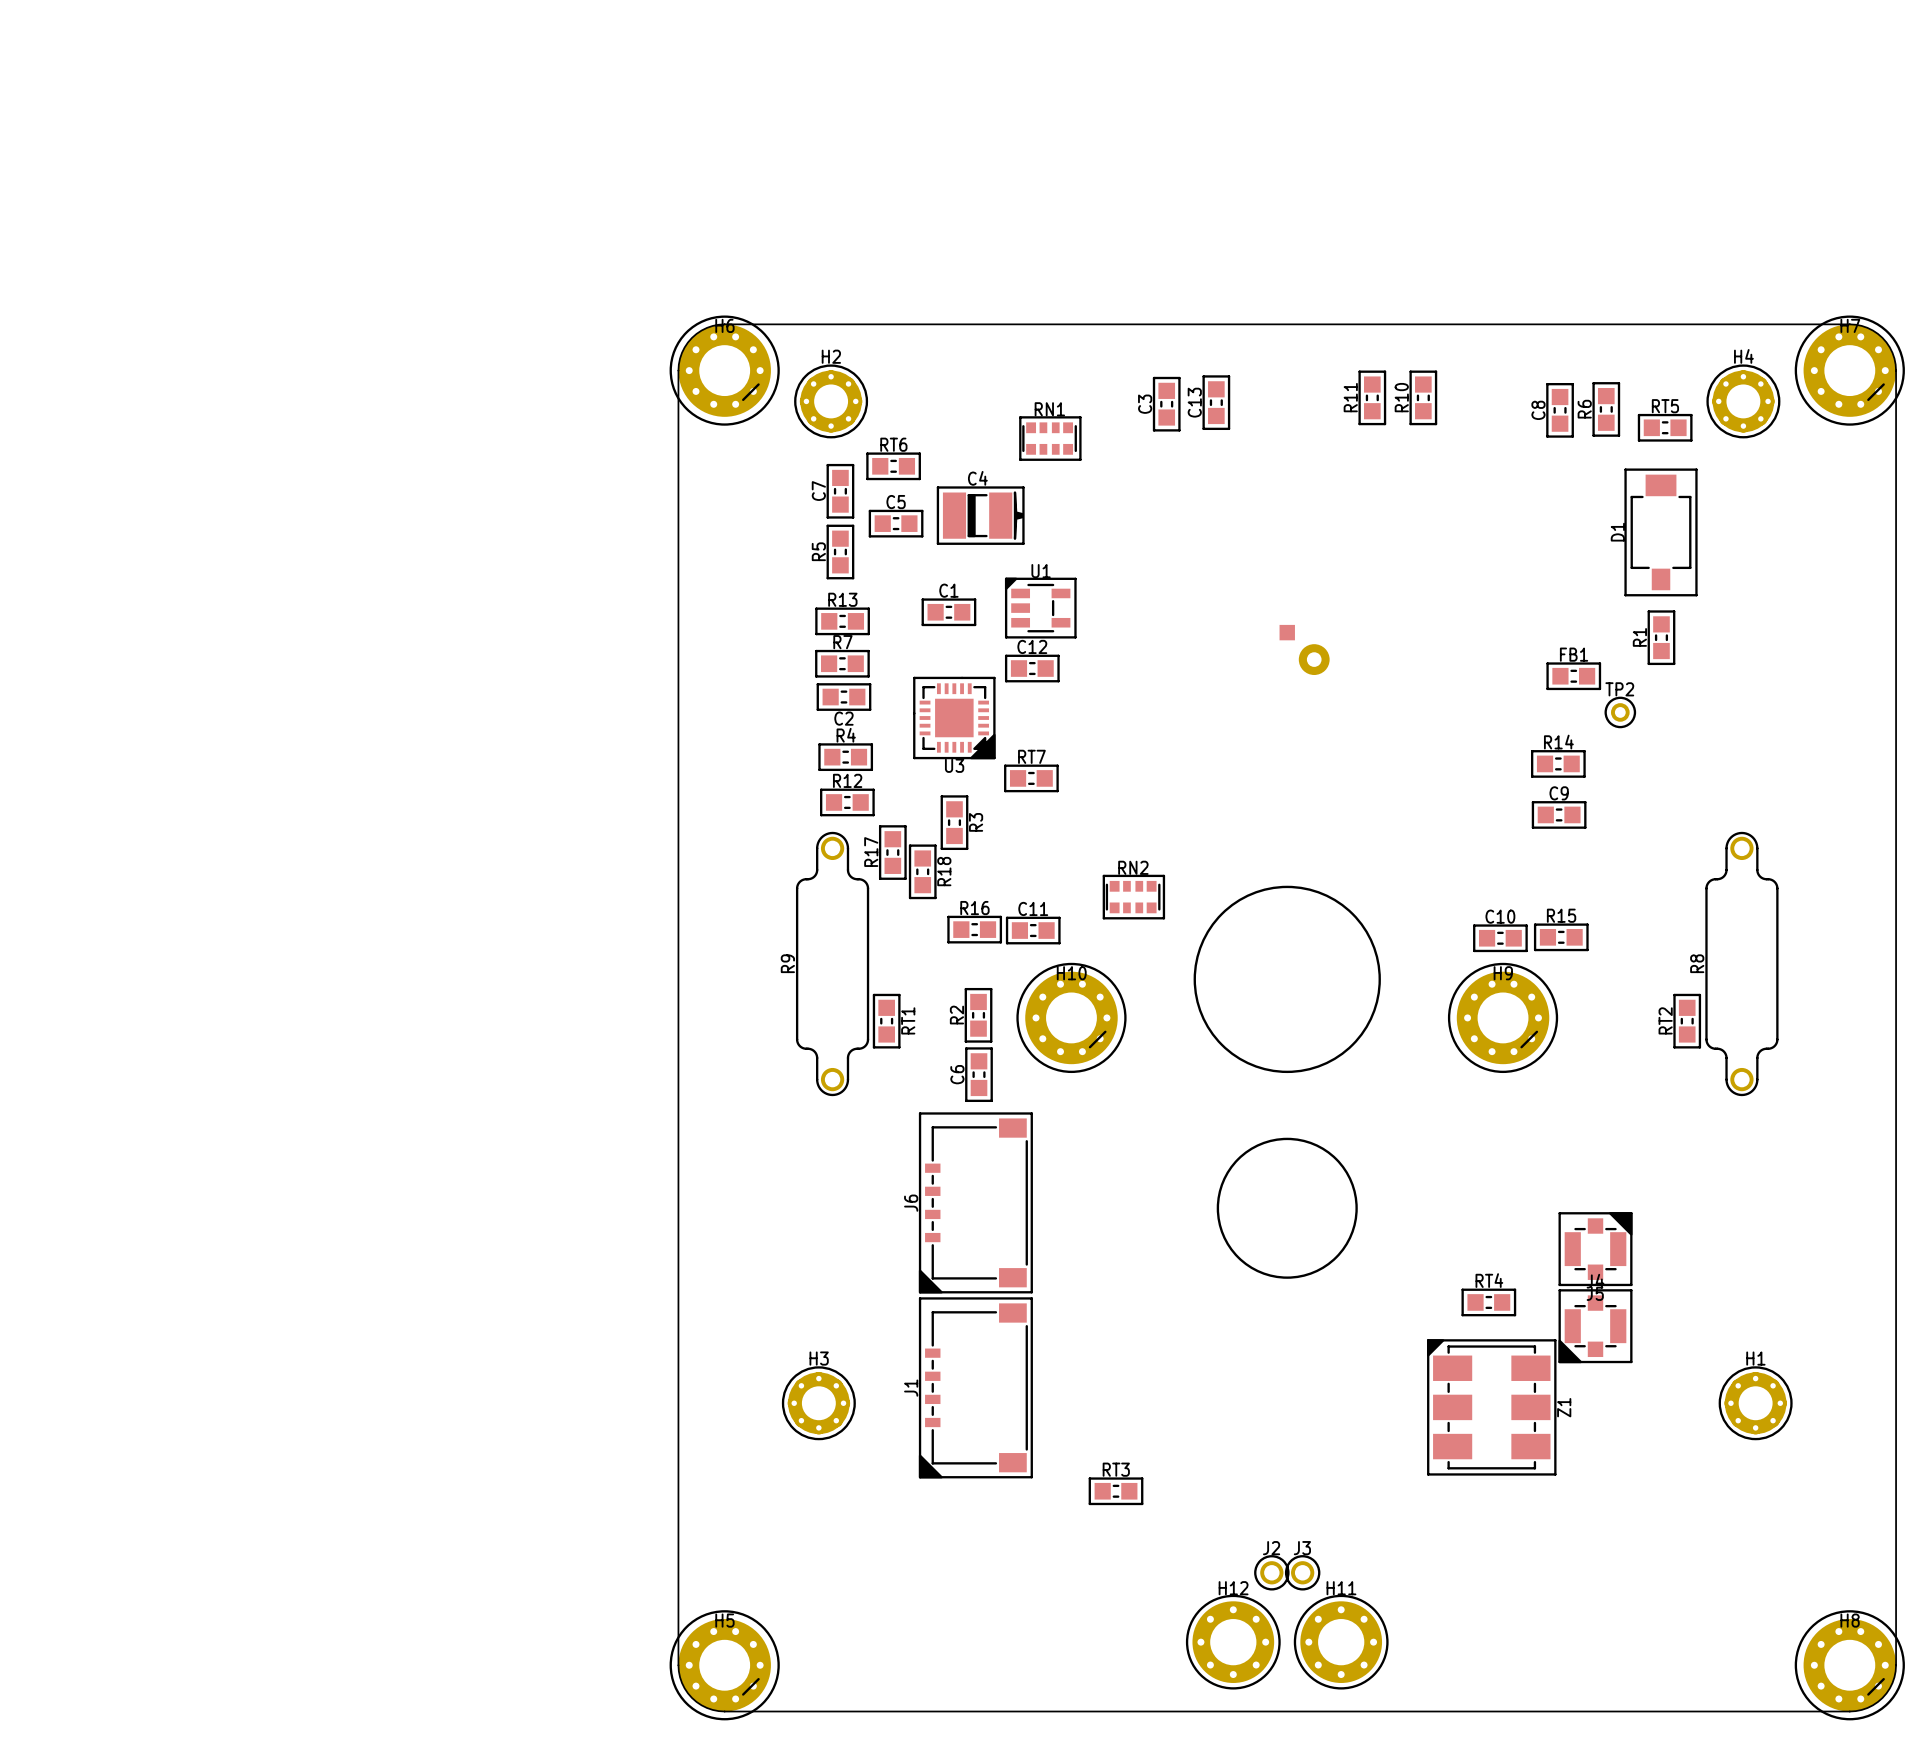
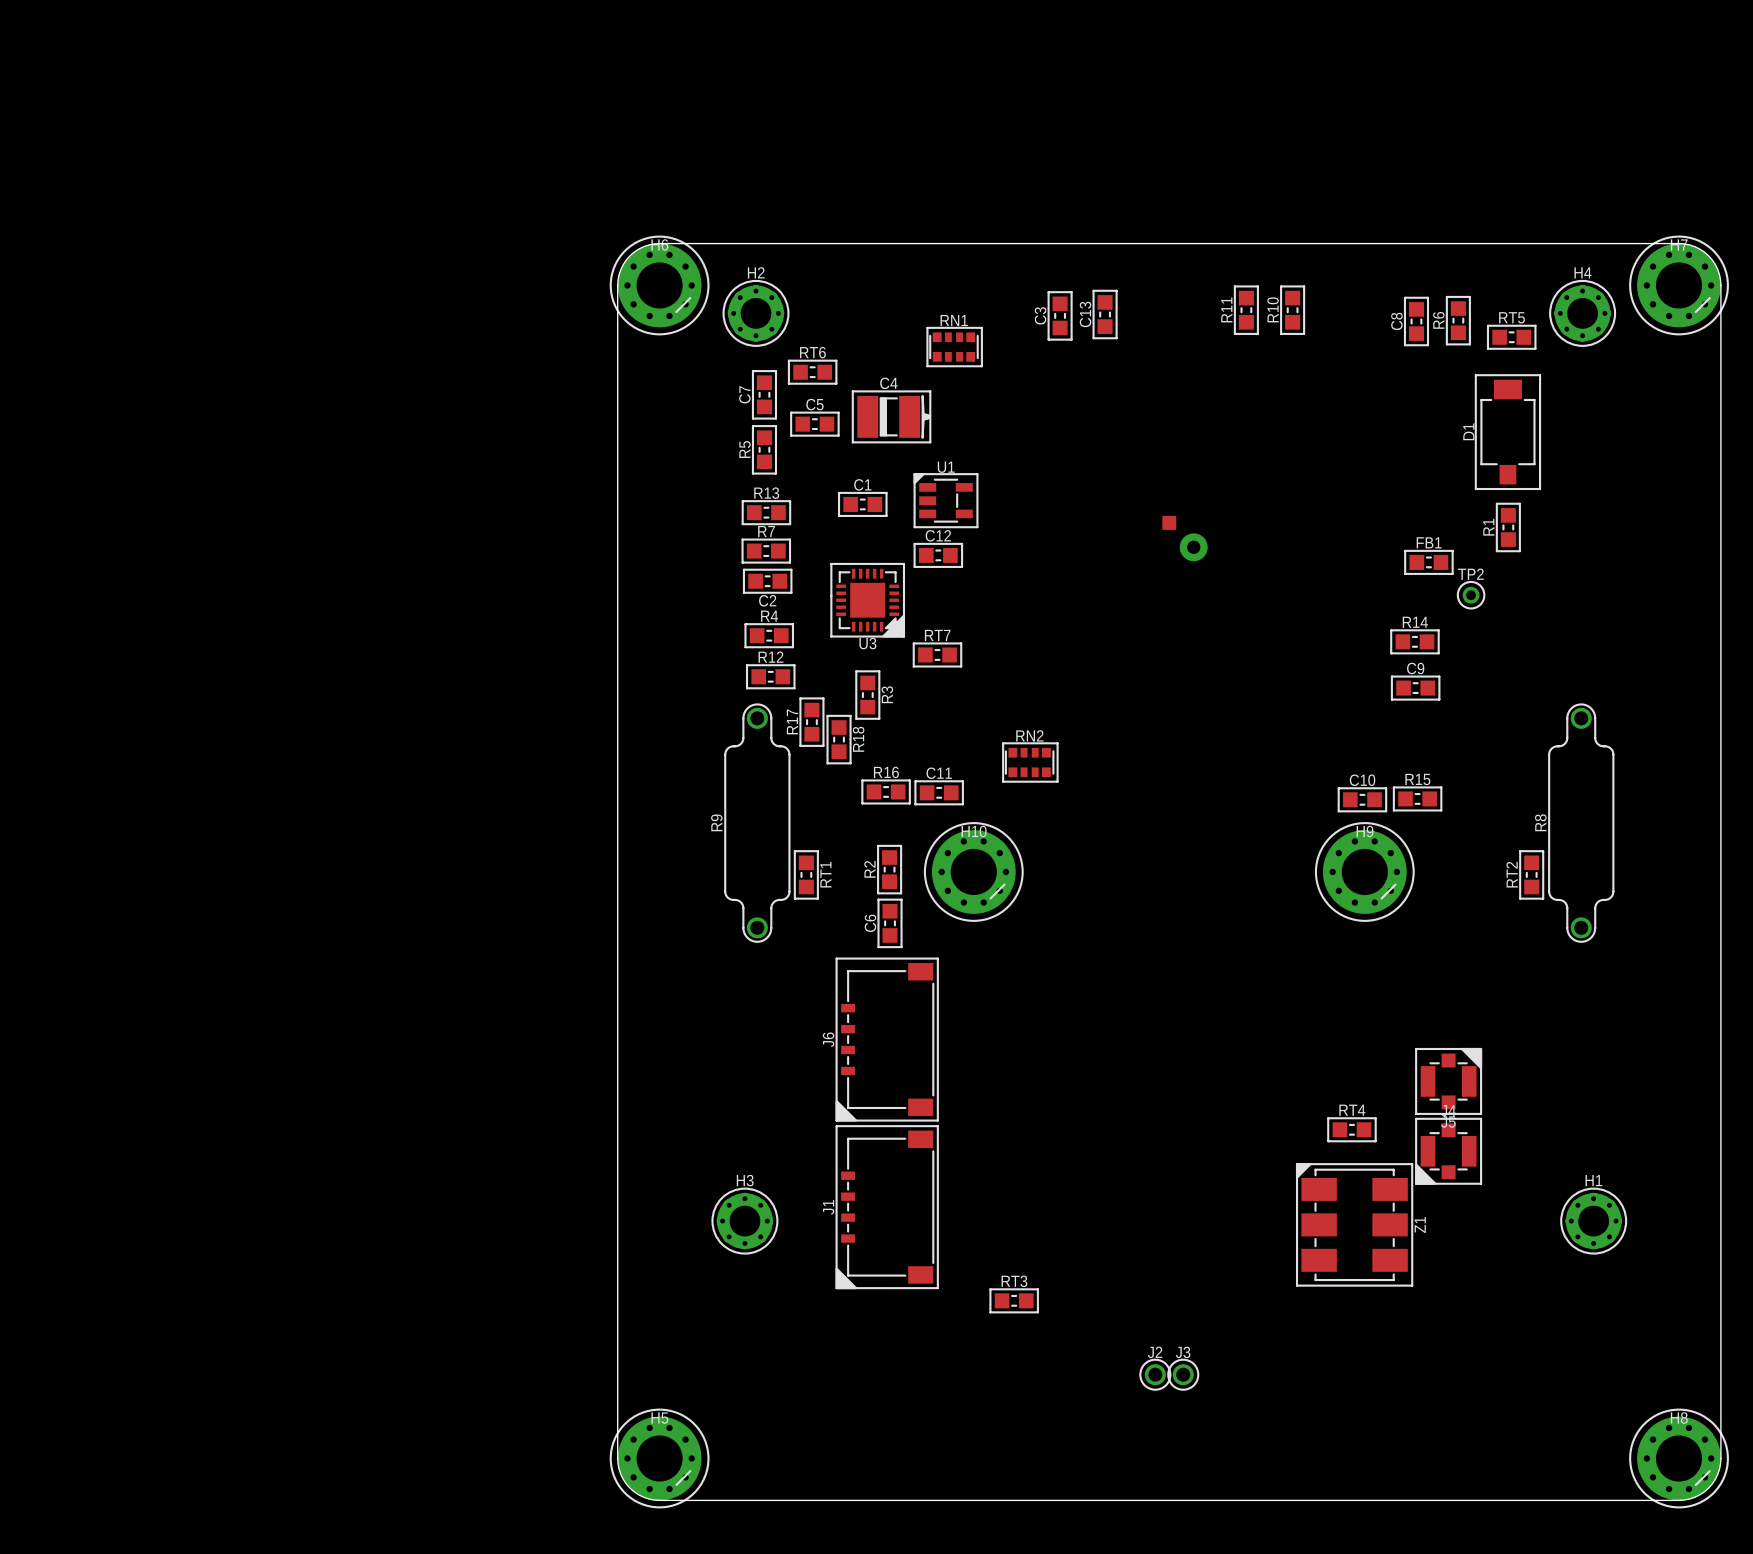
round board edge: [1193, 885, 1381, 1074] -> none
round board edge: [1216, 1137, 1358, 1279] -> none
H12: (1233, 1642) -> none
H11: (1341, 1642) -> none

